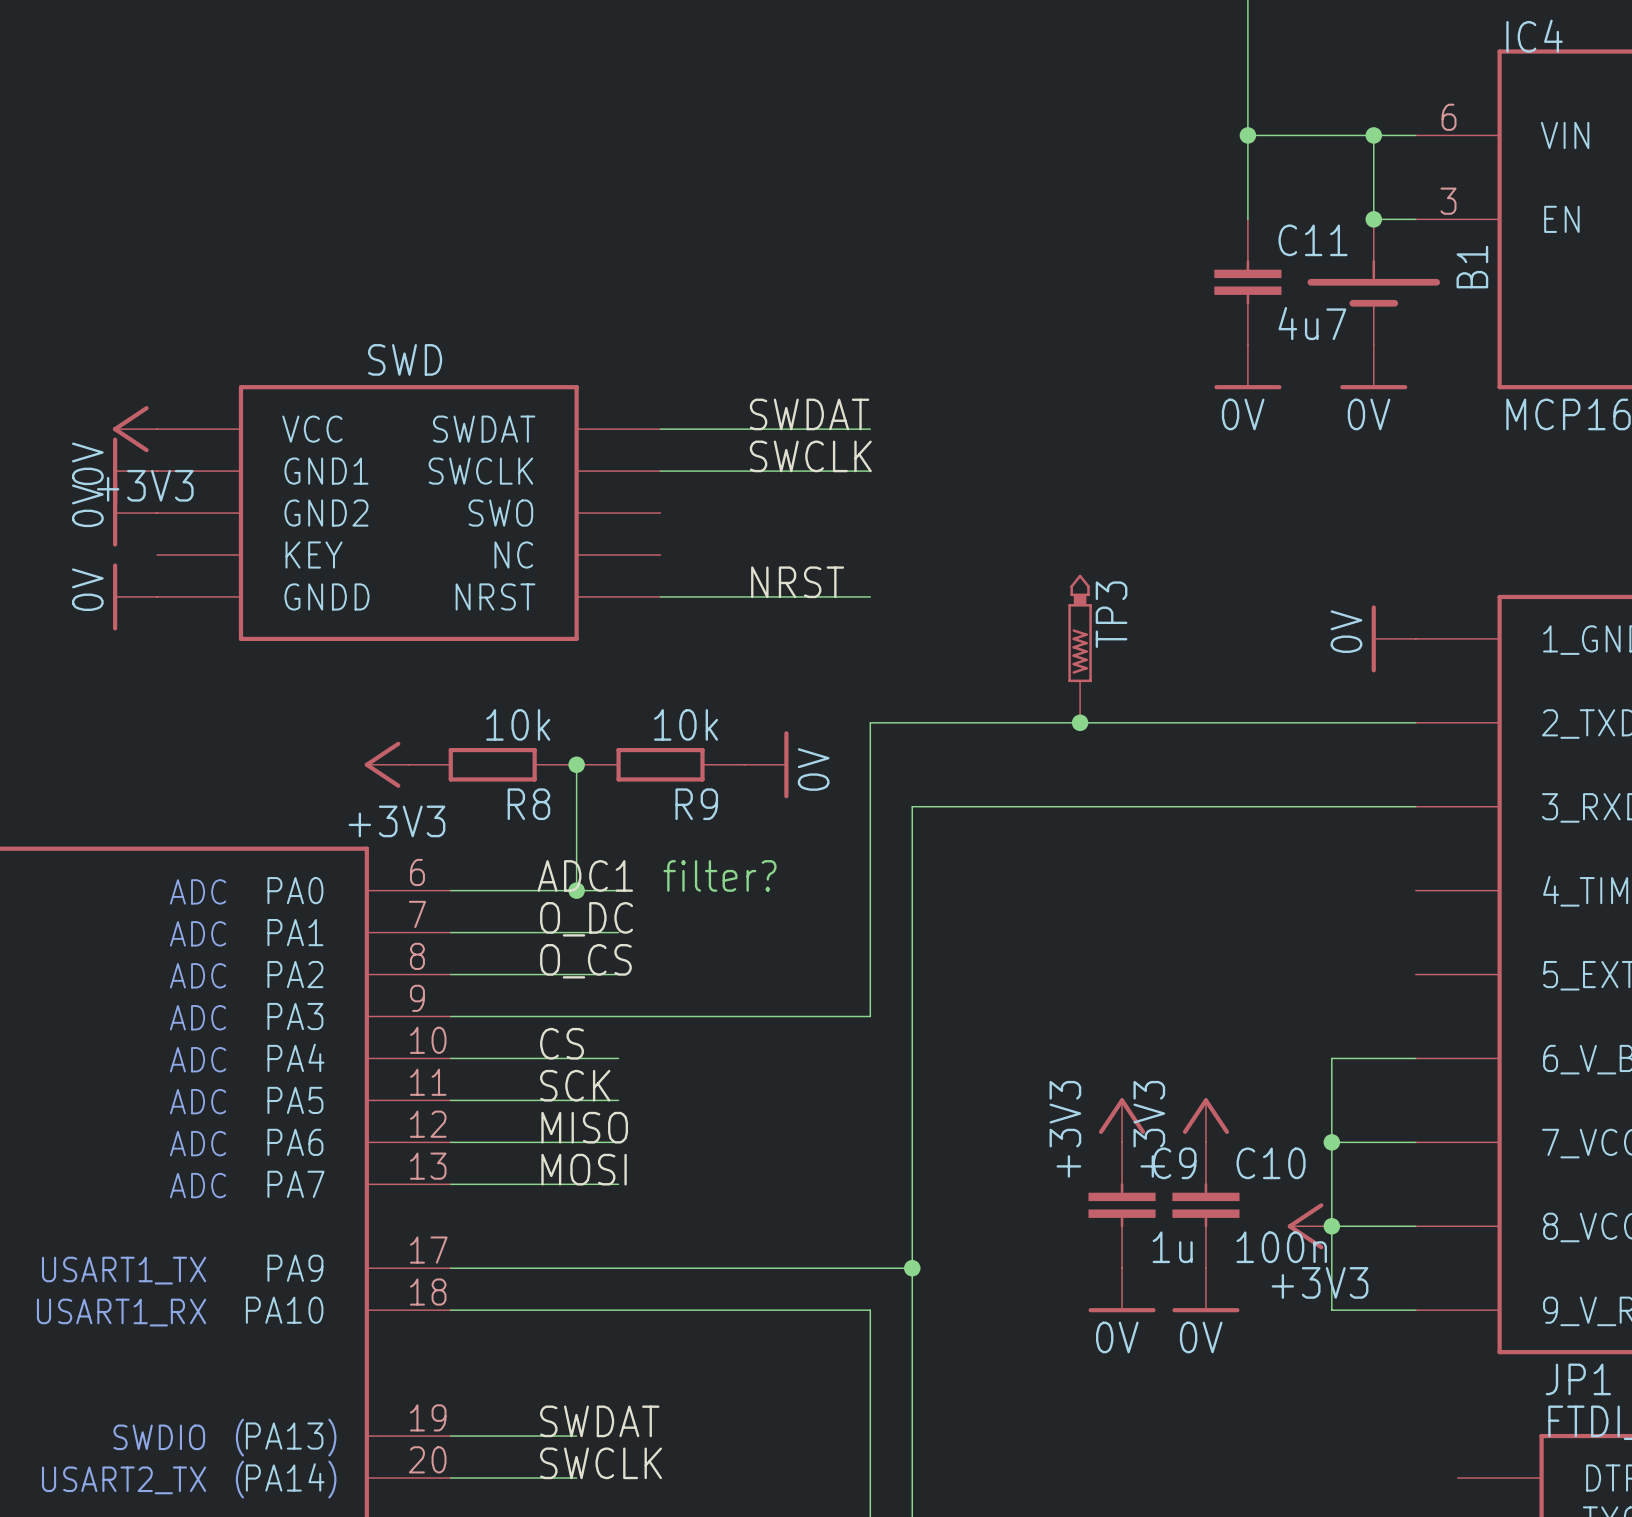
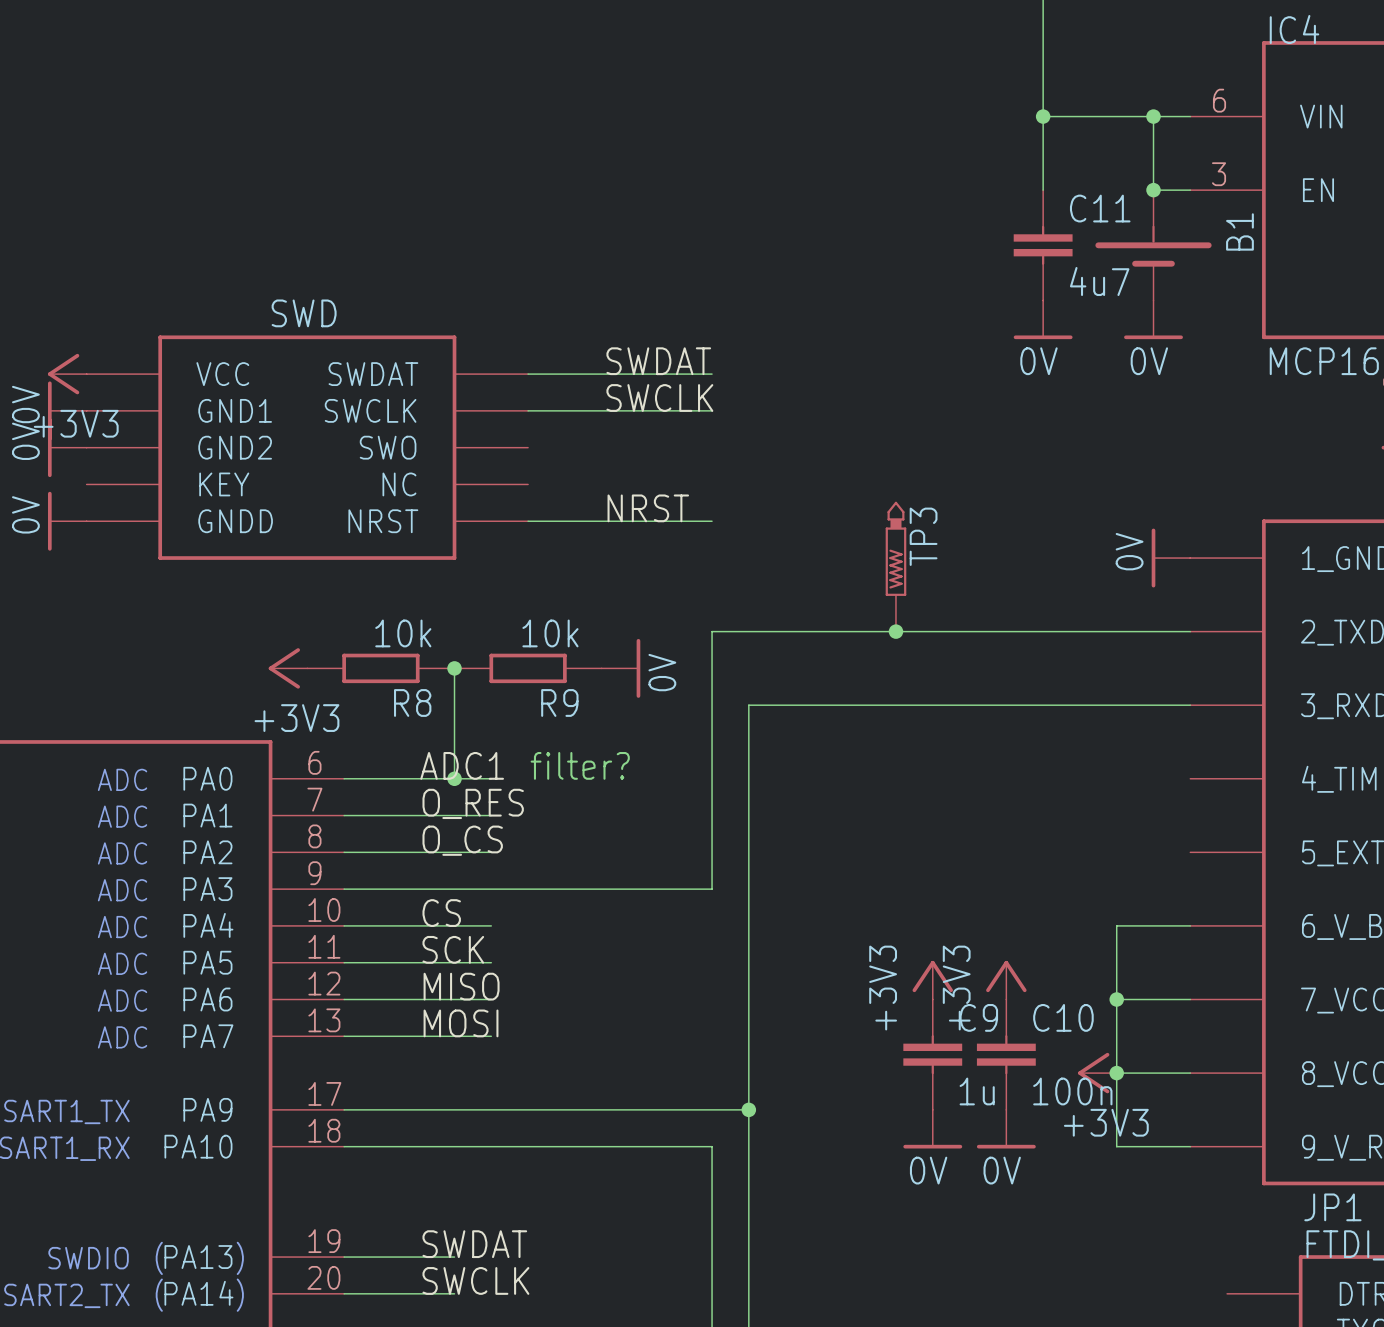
label: O_DC (586, 919) -> O_RES (473, 803)

